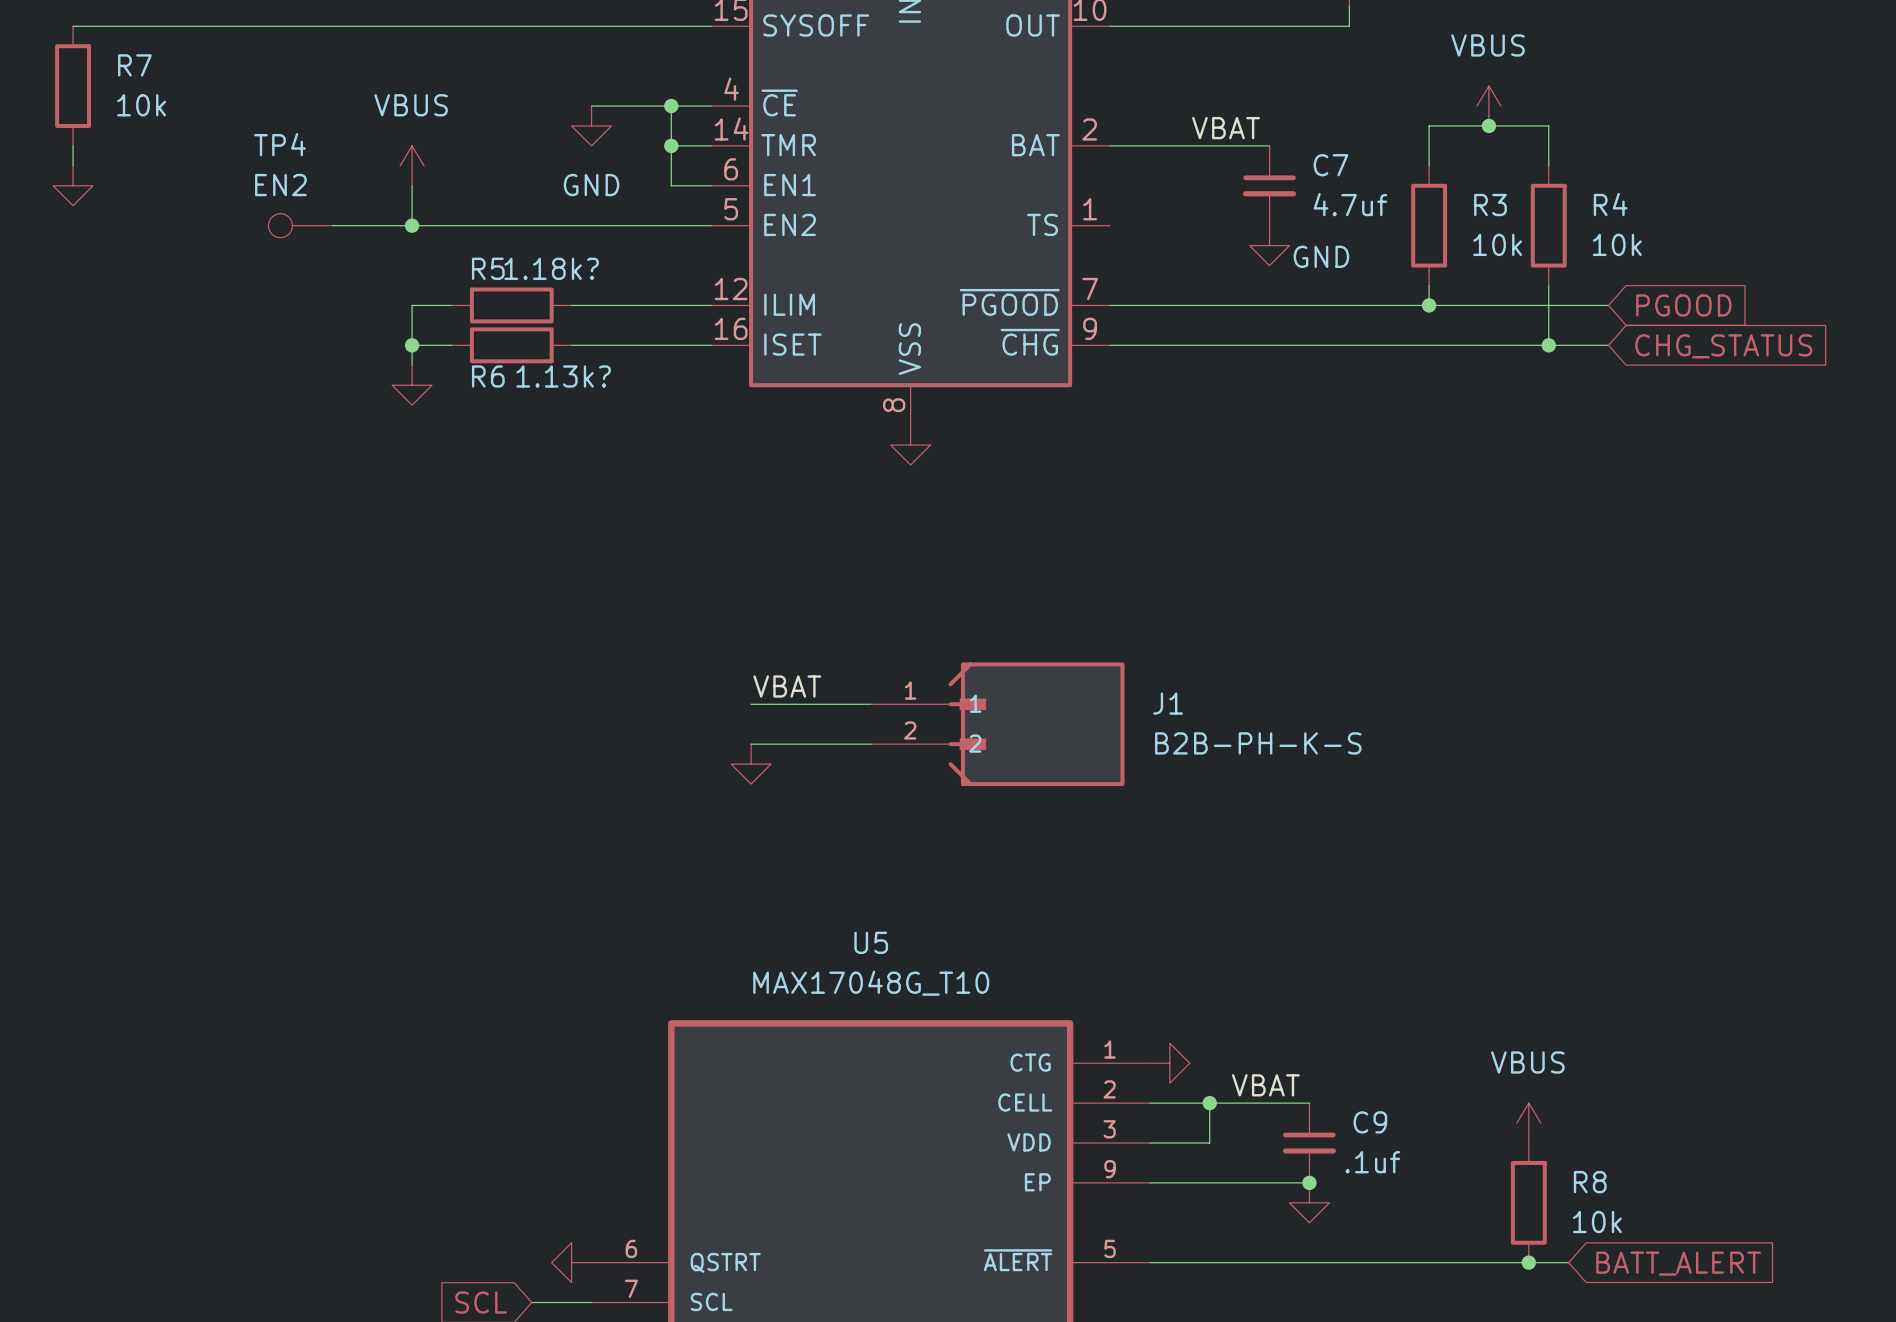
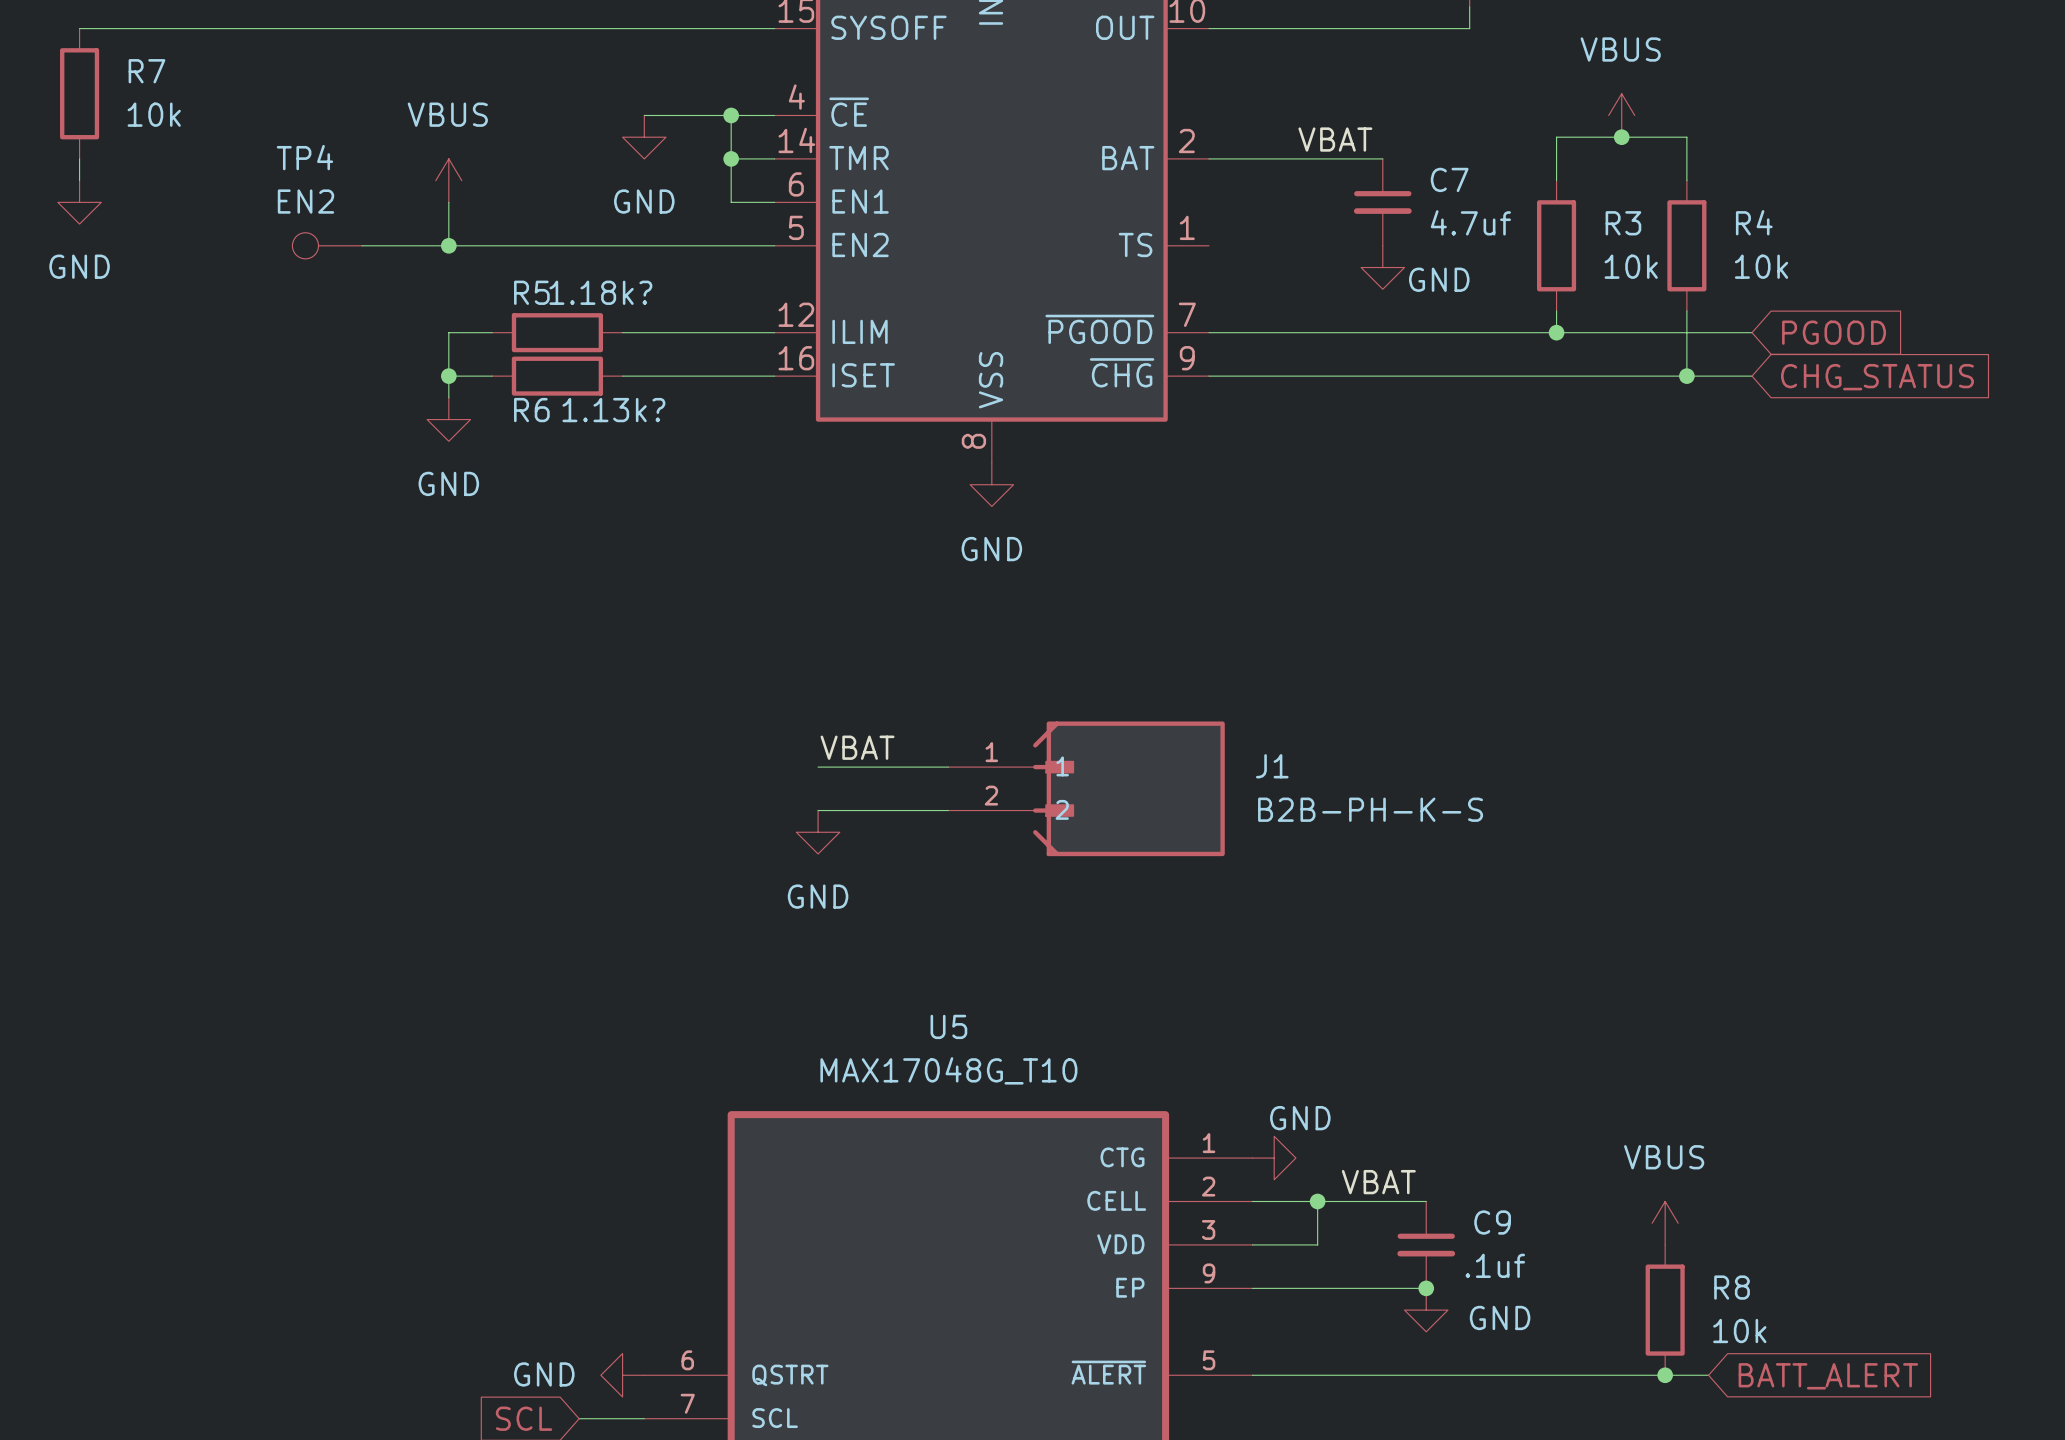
power symbol text: none -> GND (79, 266)
power symbol text: none -> GND (448, 483)
power symbol text: none -> GND (991, 549)
power symbol text: none -> GND (818, 896)
power symbol text: none -> GND (1300, 1118)
power symbol text: none -> GND (1500, 1317)
power symbol text: none -> GND (544, 1374)

